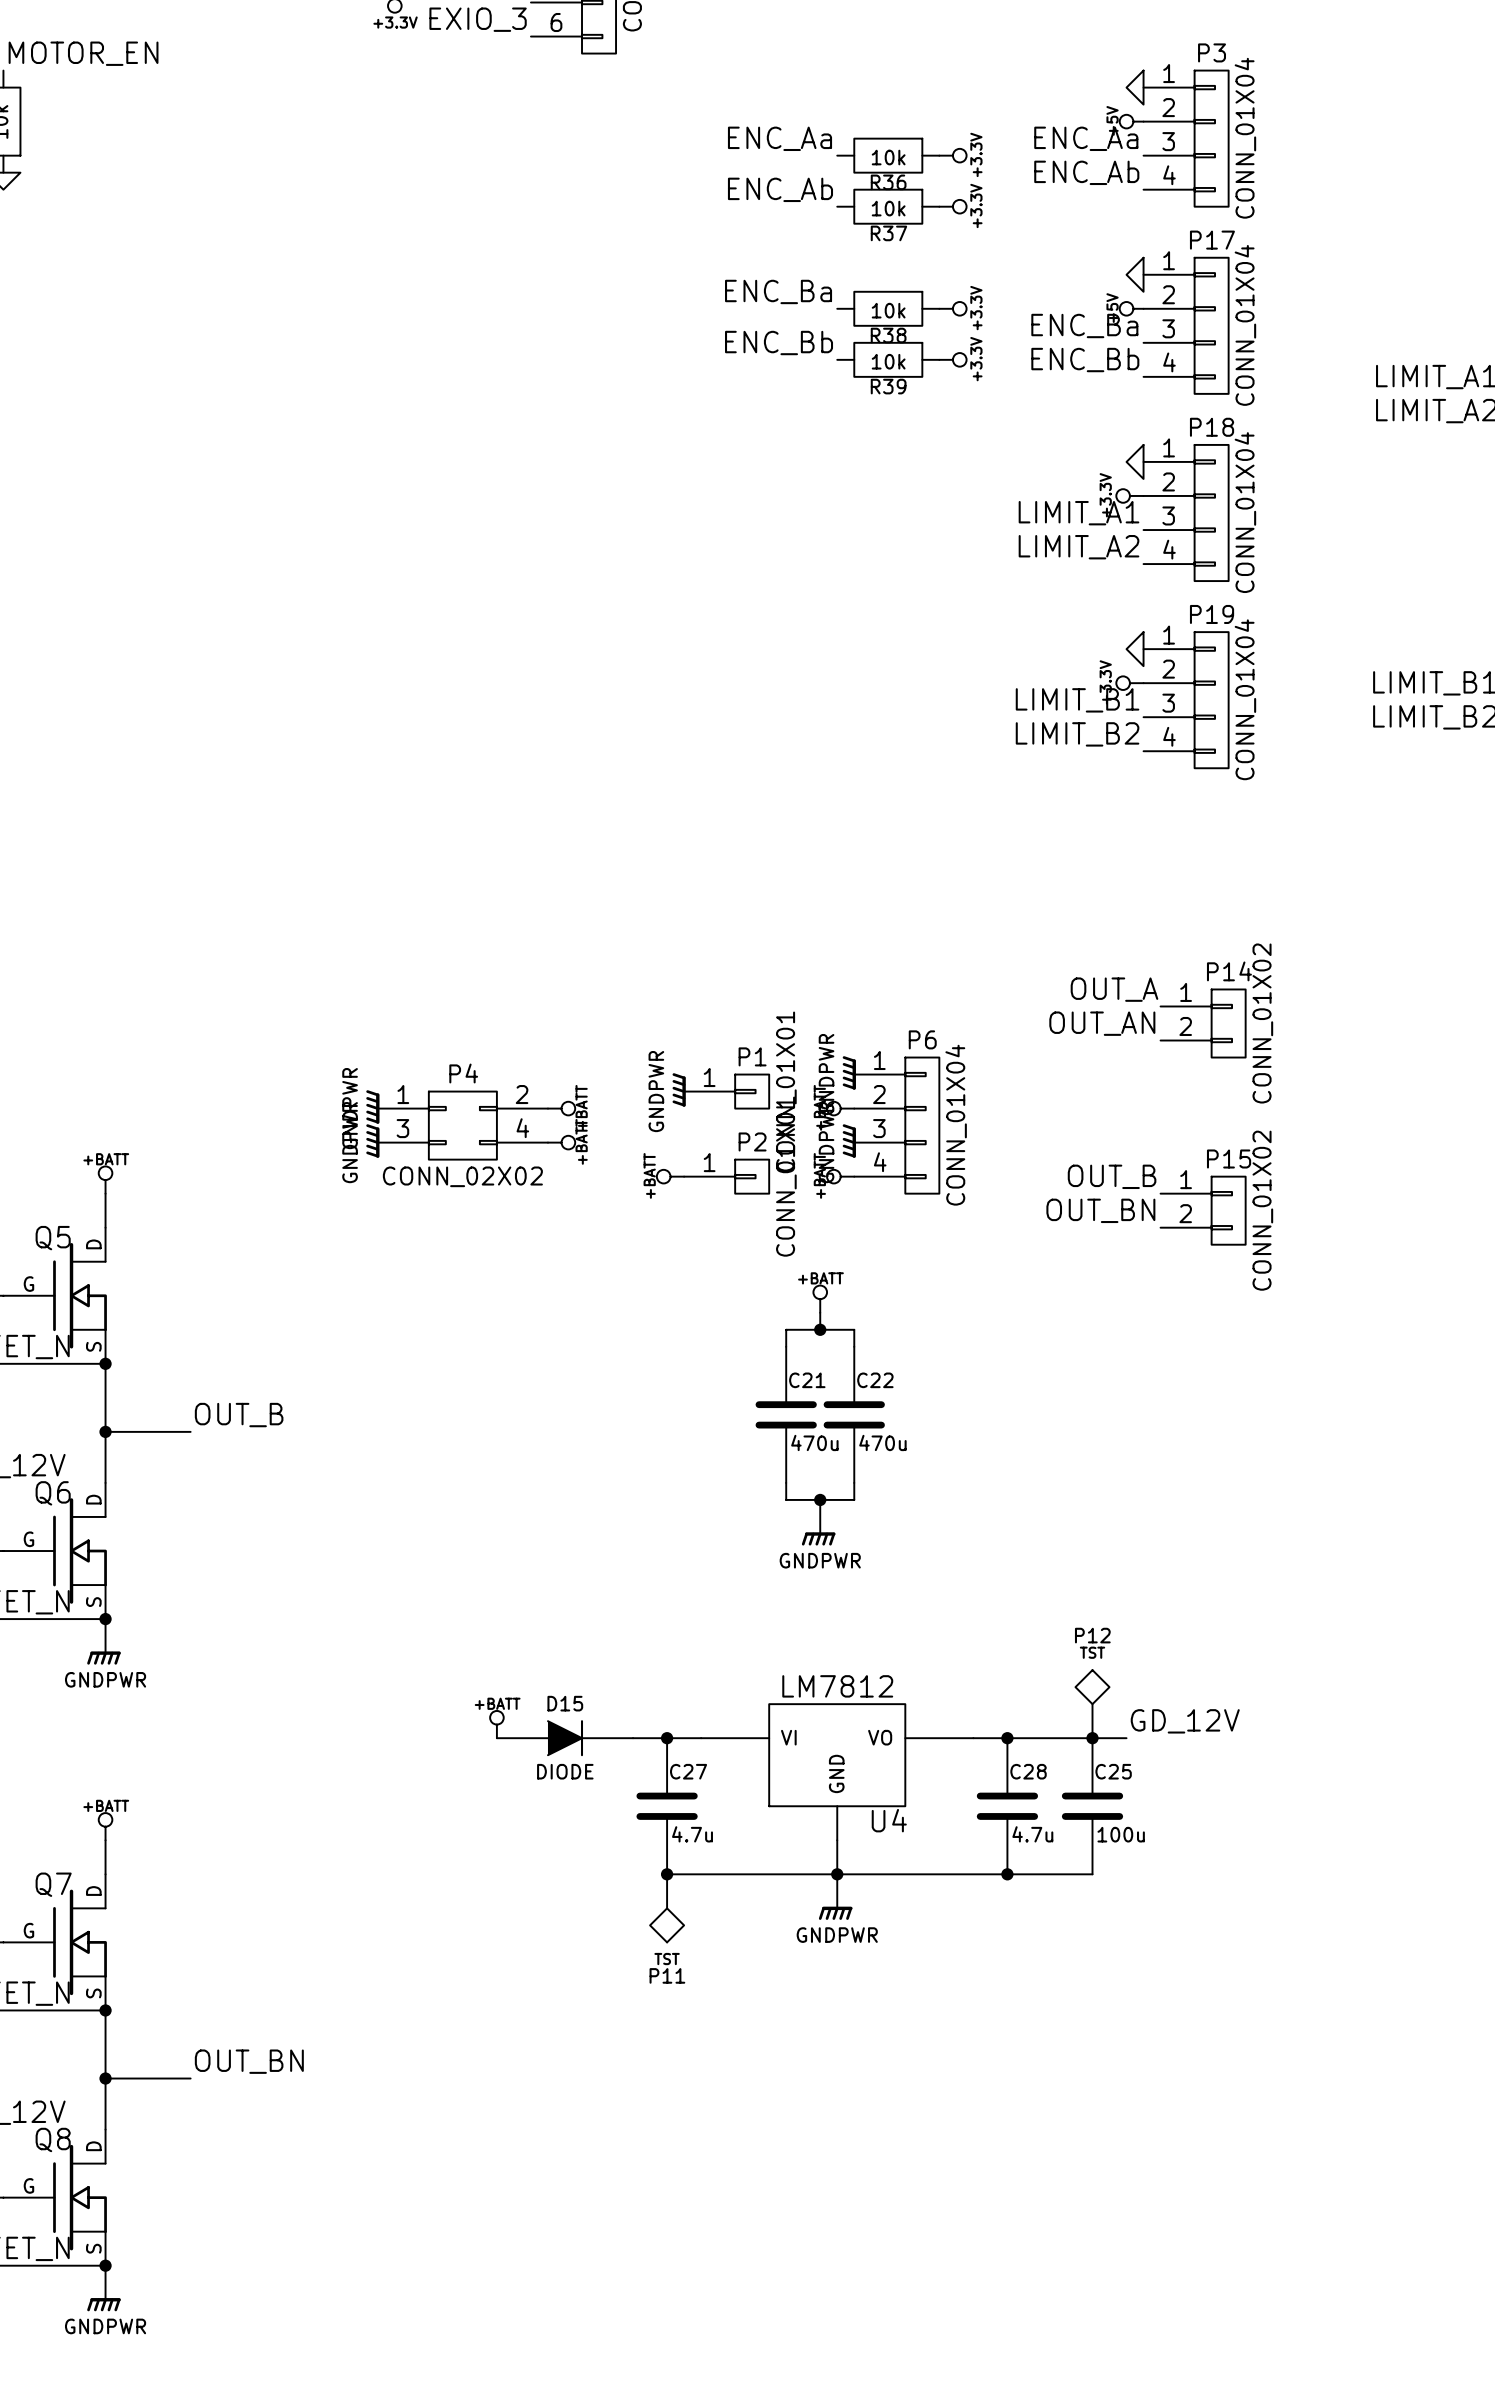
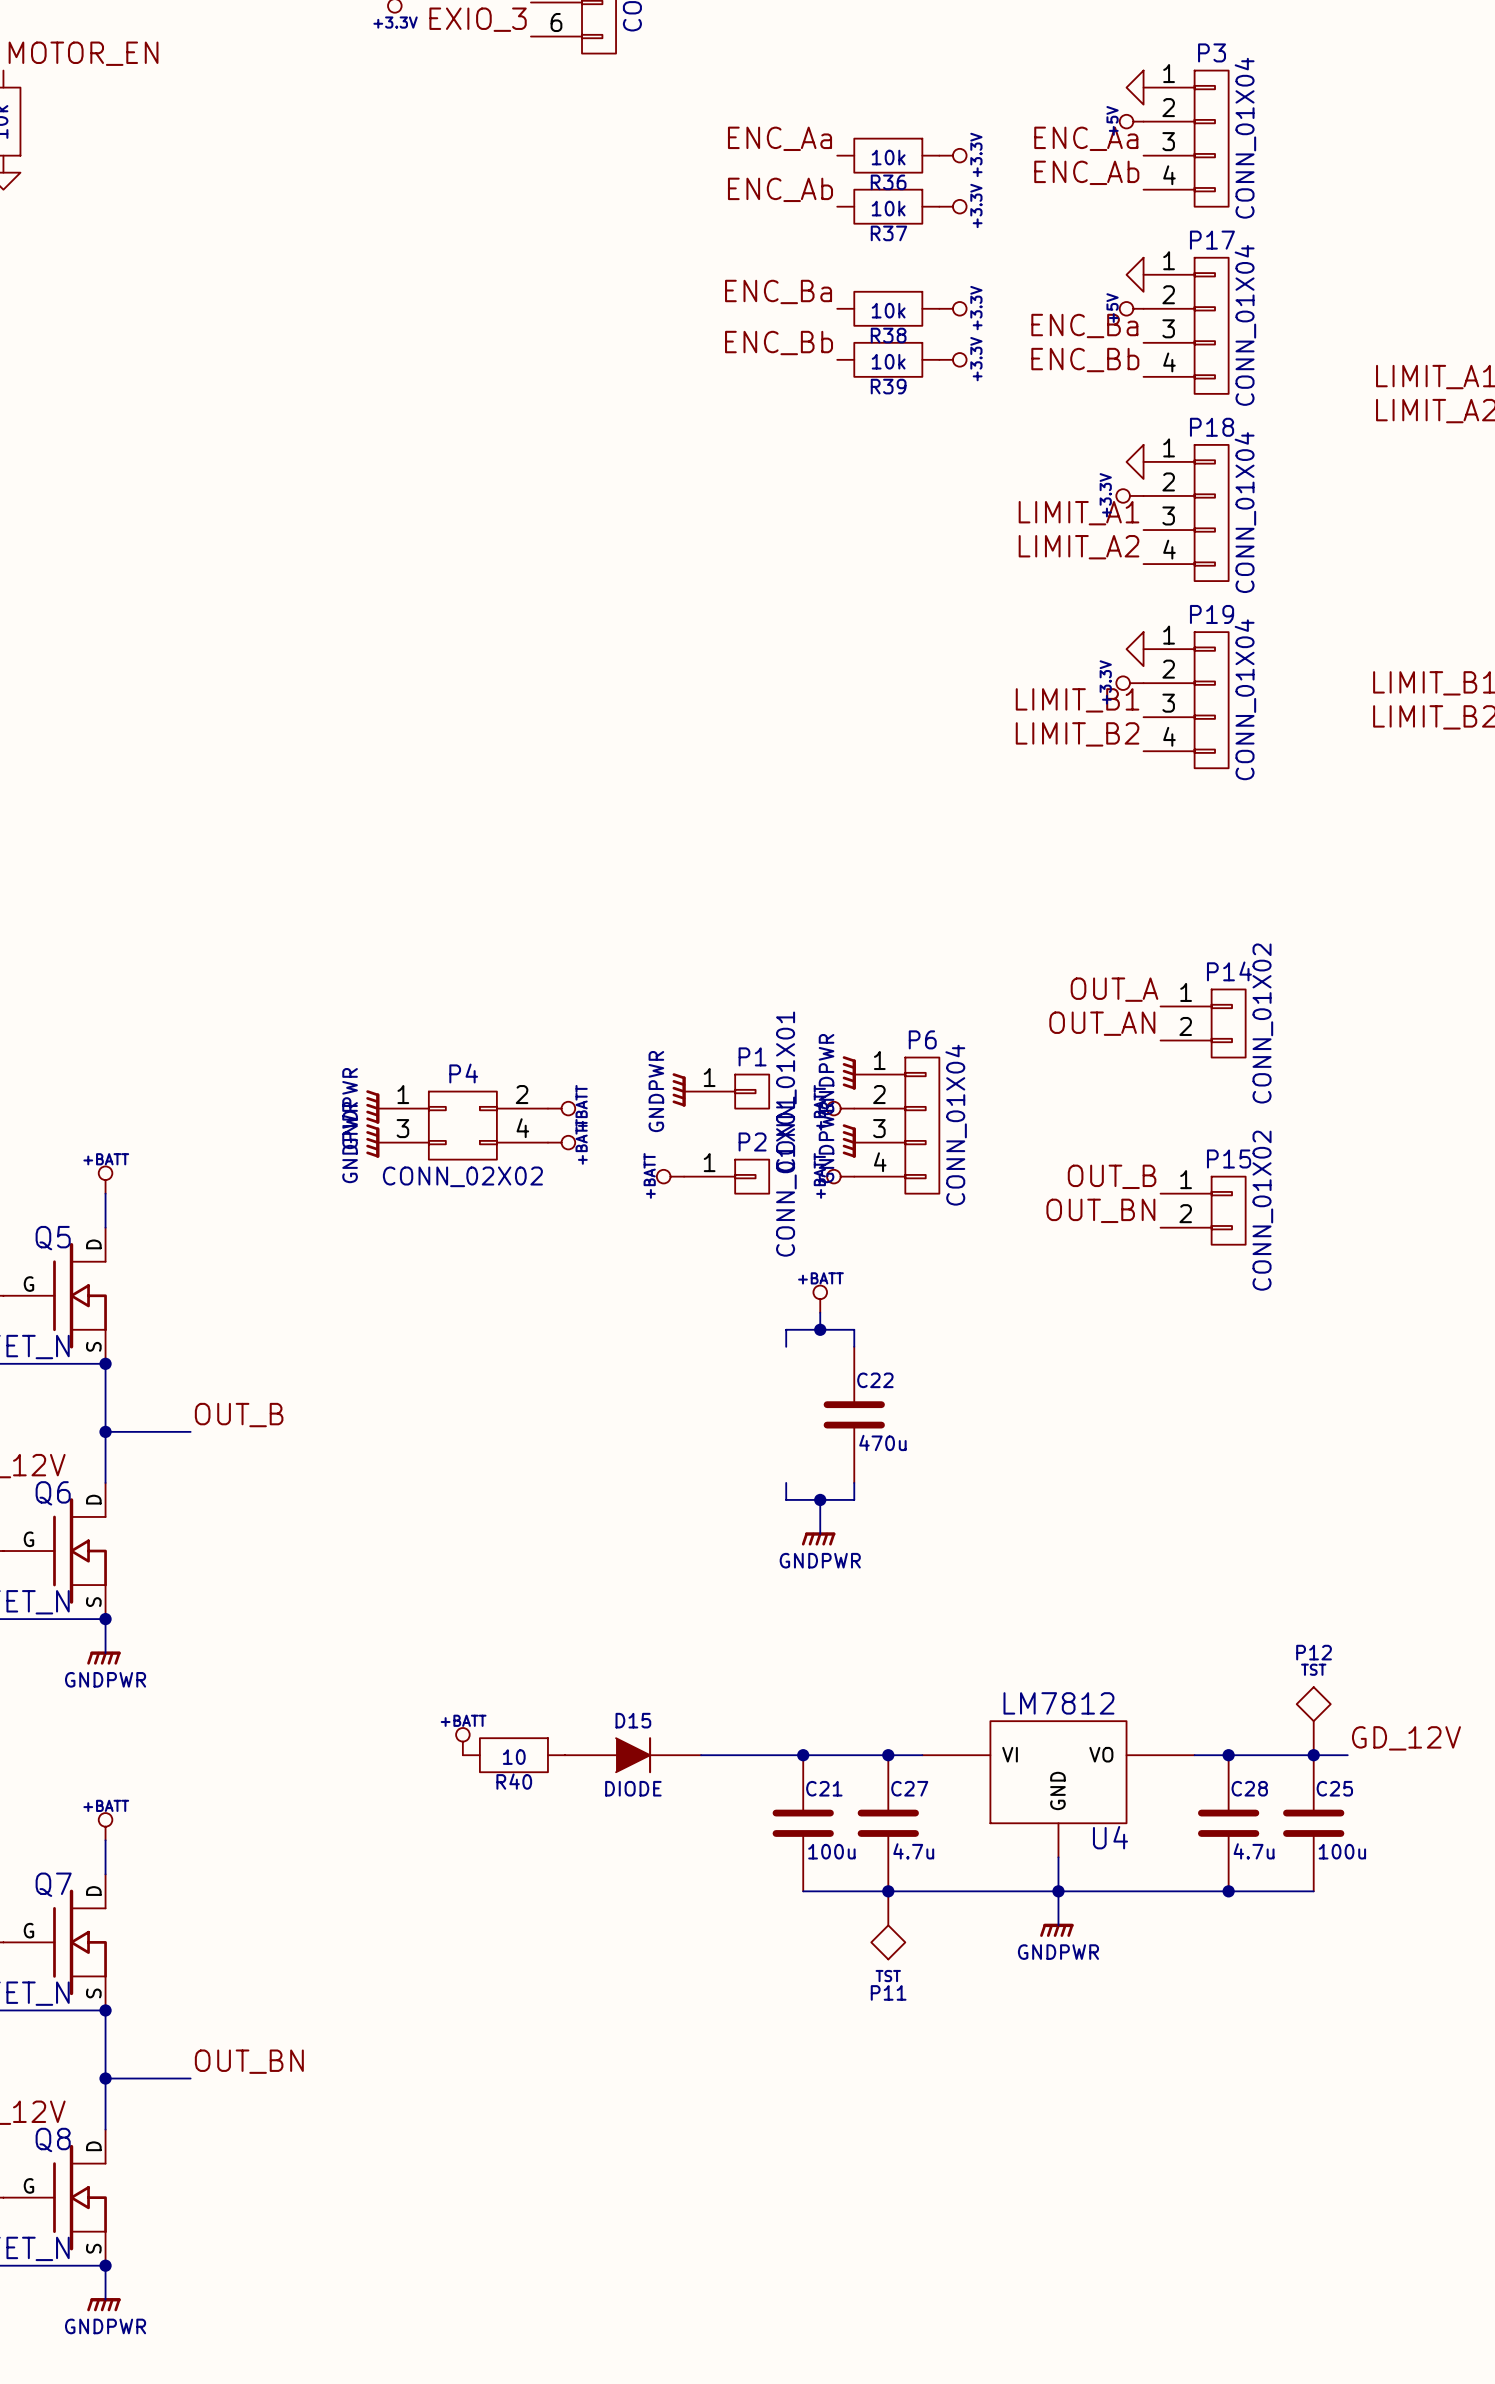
C21 position: (786, 1414) -> (803, 1823)
C21 value: 470u (814, 1442) -> 100u (831, 1851)
P12 position: (1092, 1704) -> (1313, 1721)
label position: GD_12V (1185, 1721) -> GD_12V (1406, 1738)
power symbol position: +BATT (496, 1724) -> +BATT (462, 1741)
D15 position: (564, 1738) -> (633, 1755)
wire: (633, 1738) (701, 1738) -> none
junction: (667, 1738) -> none
wire: (973, 1738) (1126, 1738) -> (1194, 1755) (1347, 1755)
junction: (1007, 1738) -> none
junction: (1092, 1738) -> none
R40: none -> 10 (513, 1755)
wire: none -> (701, 1755) (922, 1755)
junction: none -> (803, 1755)
junction: none -> (888, 1755)
junction: none -> (1228, 1755)
junction: none -> (1313, 1755)
U4 position: (837, 1772) -> (1058, 1789)
C27 position: (667, 1806) -> (888, 1823)
C28 position: (1007, 1806) -> (1228, 1823)
C25 position: (1092, 1806) -> (1313, 1823)
wire: (837, 1840) (837, 1908) -> (1058, 1857) (1058, 1925)
wire: (667, 1874) (1092, 1874) -> none
junction: (667, 1874) -> none
junction position: (837, 1874) -> (888, 1891)
junction position: (1007, 1874) -> (1058, 1891)
wire: none -> (803, 1891) (1313, 1891)
junction: none -> (1228, 1891)
P11 position: (667, 1908) -> (888, 1925)
power symbol position: GNDPWR (835, 1913) -> GNDPWR (1056, 1930)

